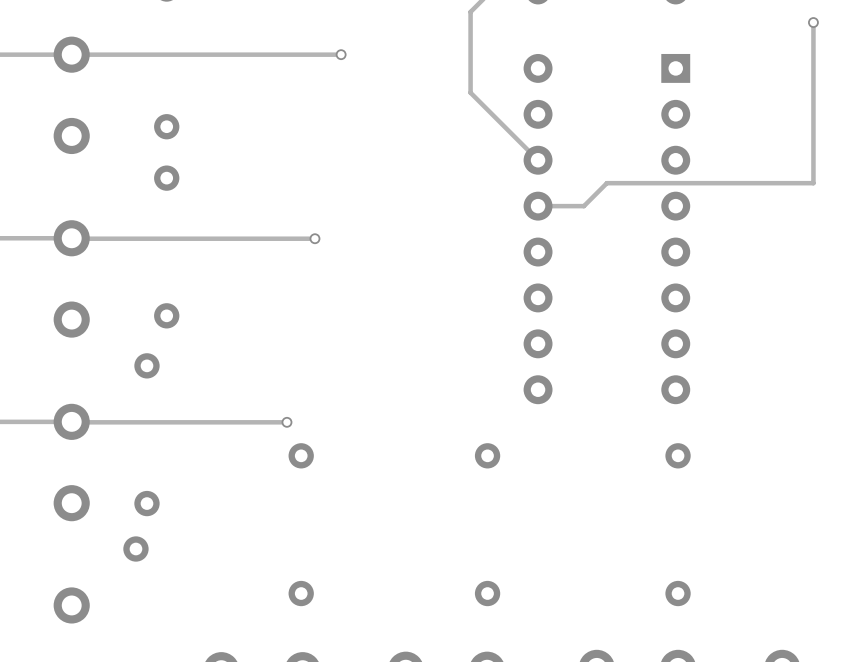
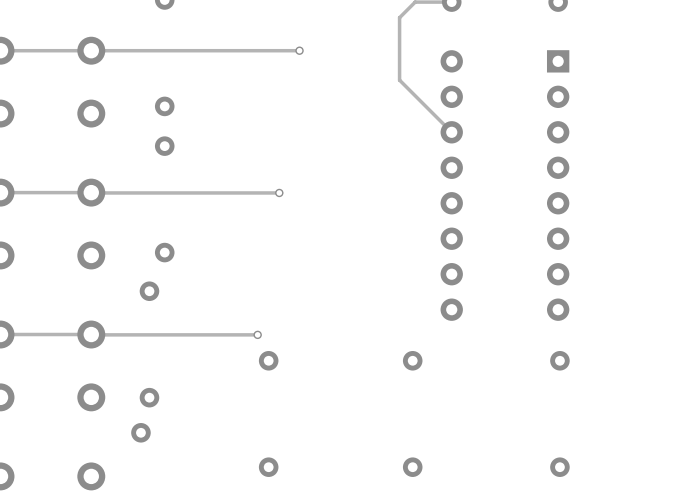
track: (813, 22) (813, 183) (606, 183) (583, 206) (538, 206) -> none
via: (813, 22) -> none

